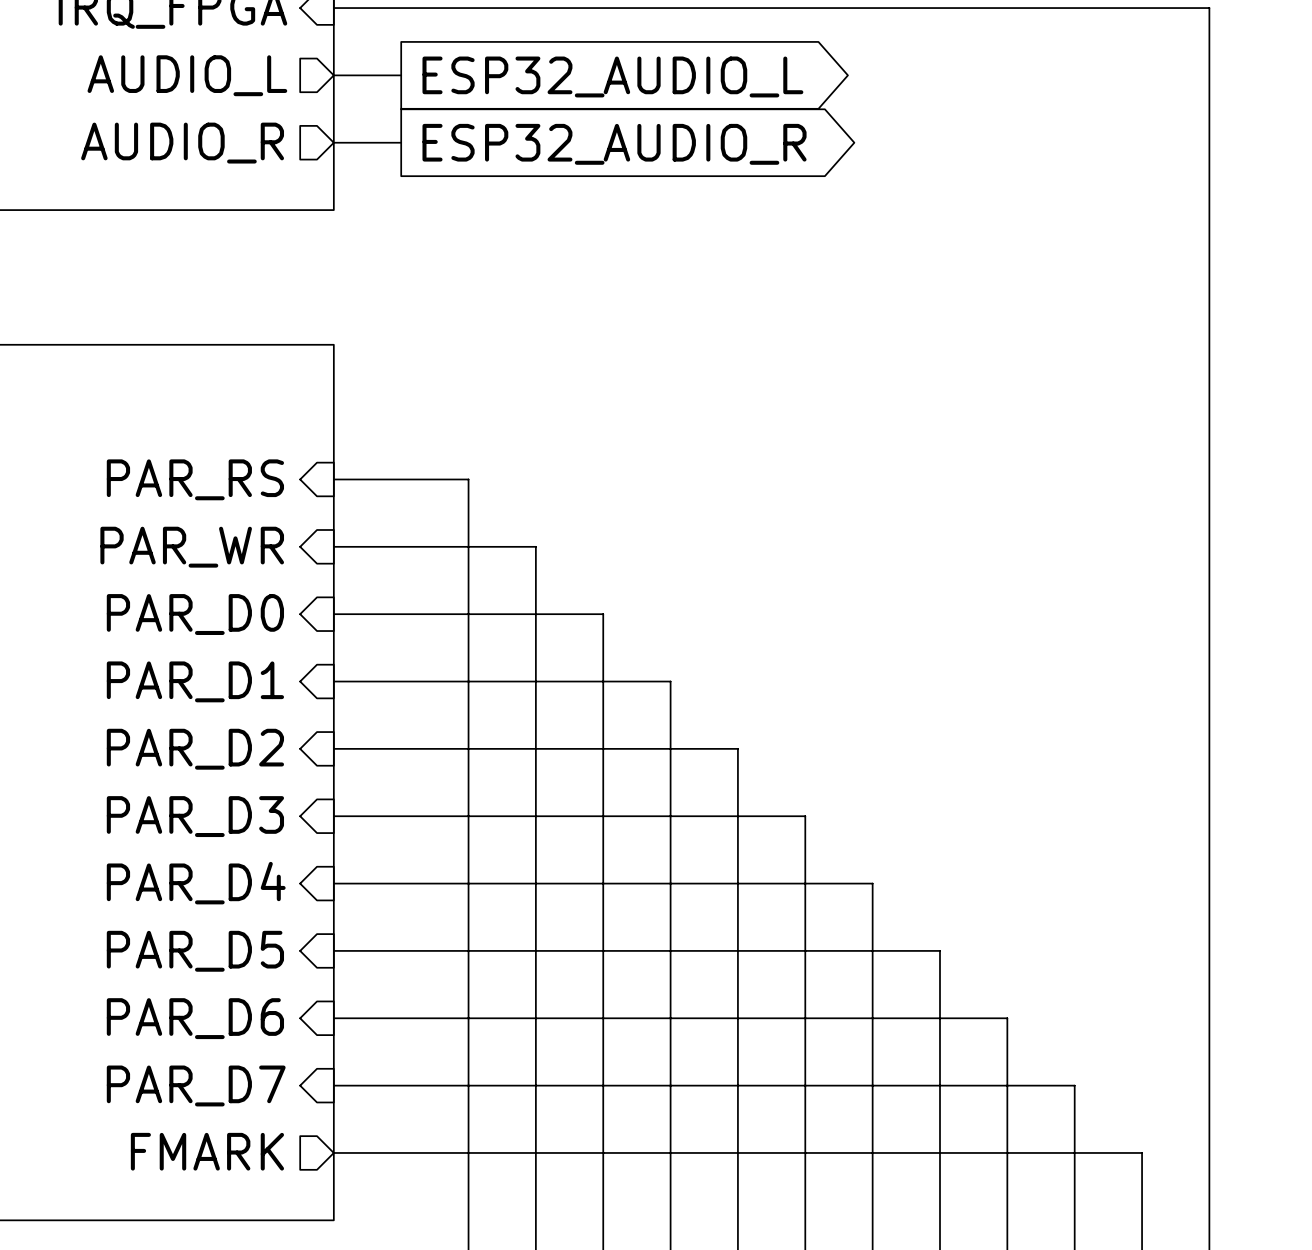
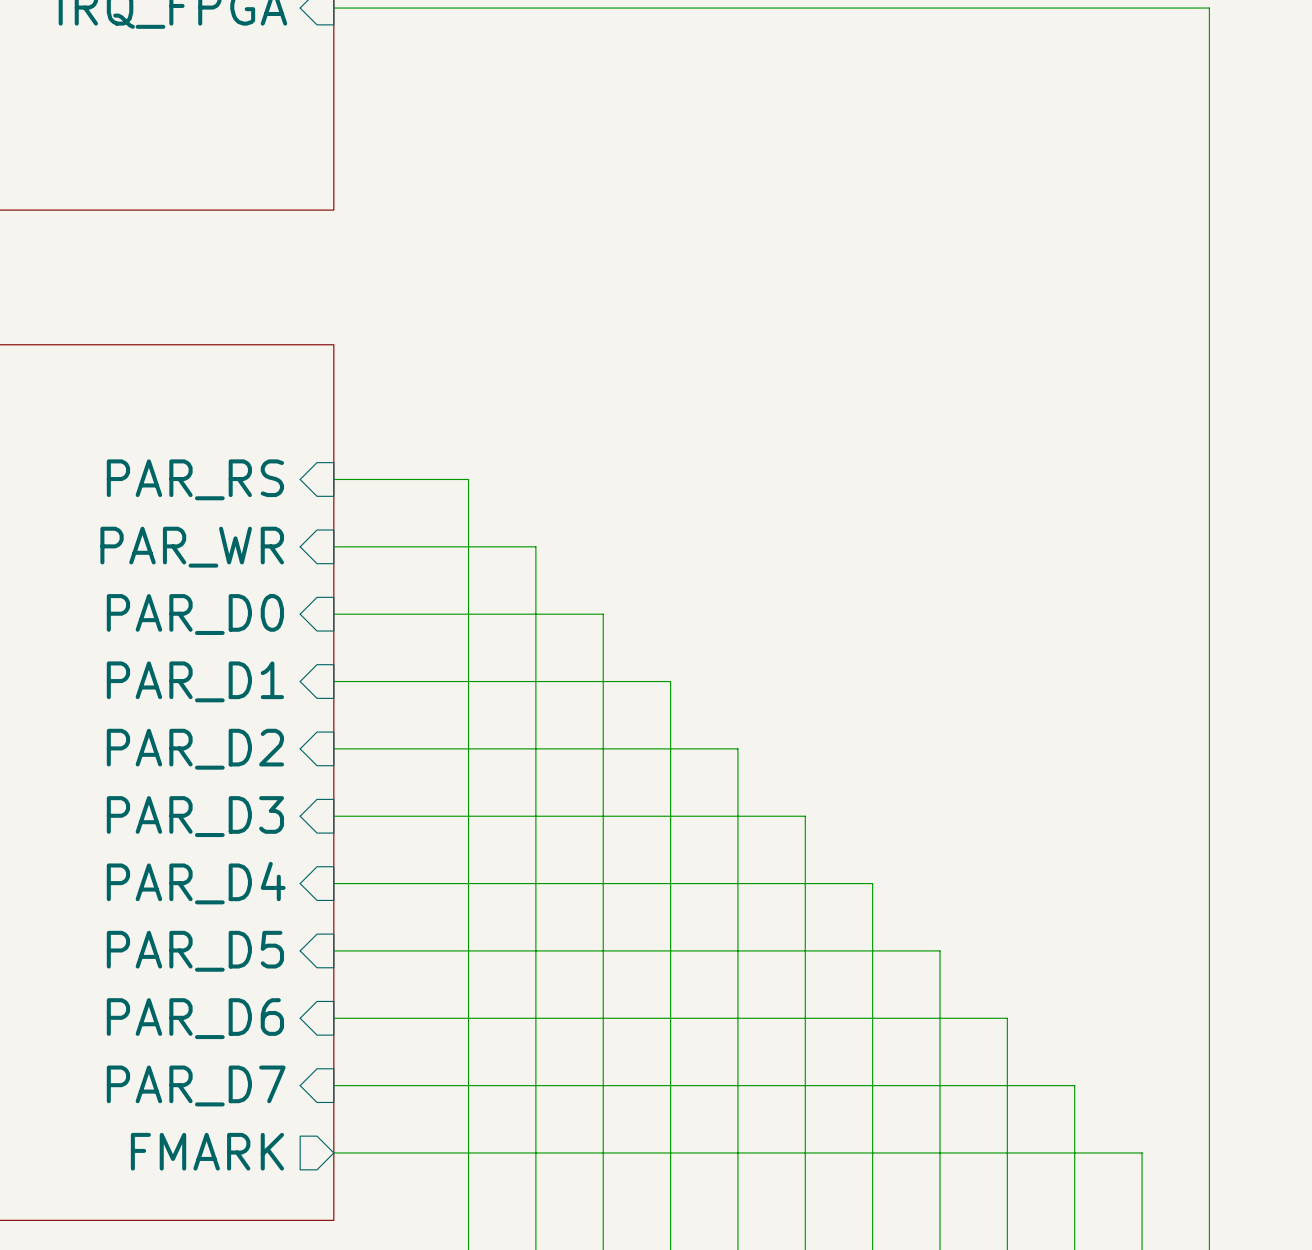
sheet pin: AUDIO_L (187, 75) -> none
wire: (333, 75) (401, 75) -> none
global label: ESP32_AUDIO_L (612, 76) -> none
wire: (333, 142) (401, 142) -> none
sheet pin: AUDIO_R (182, 143) -> none
global label: ESP32_AUDIO_R (614, 144) -> none

